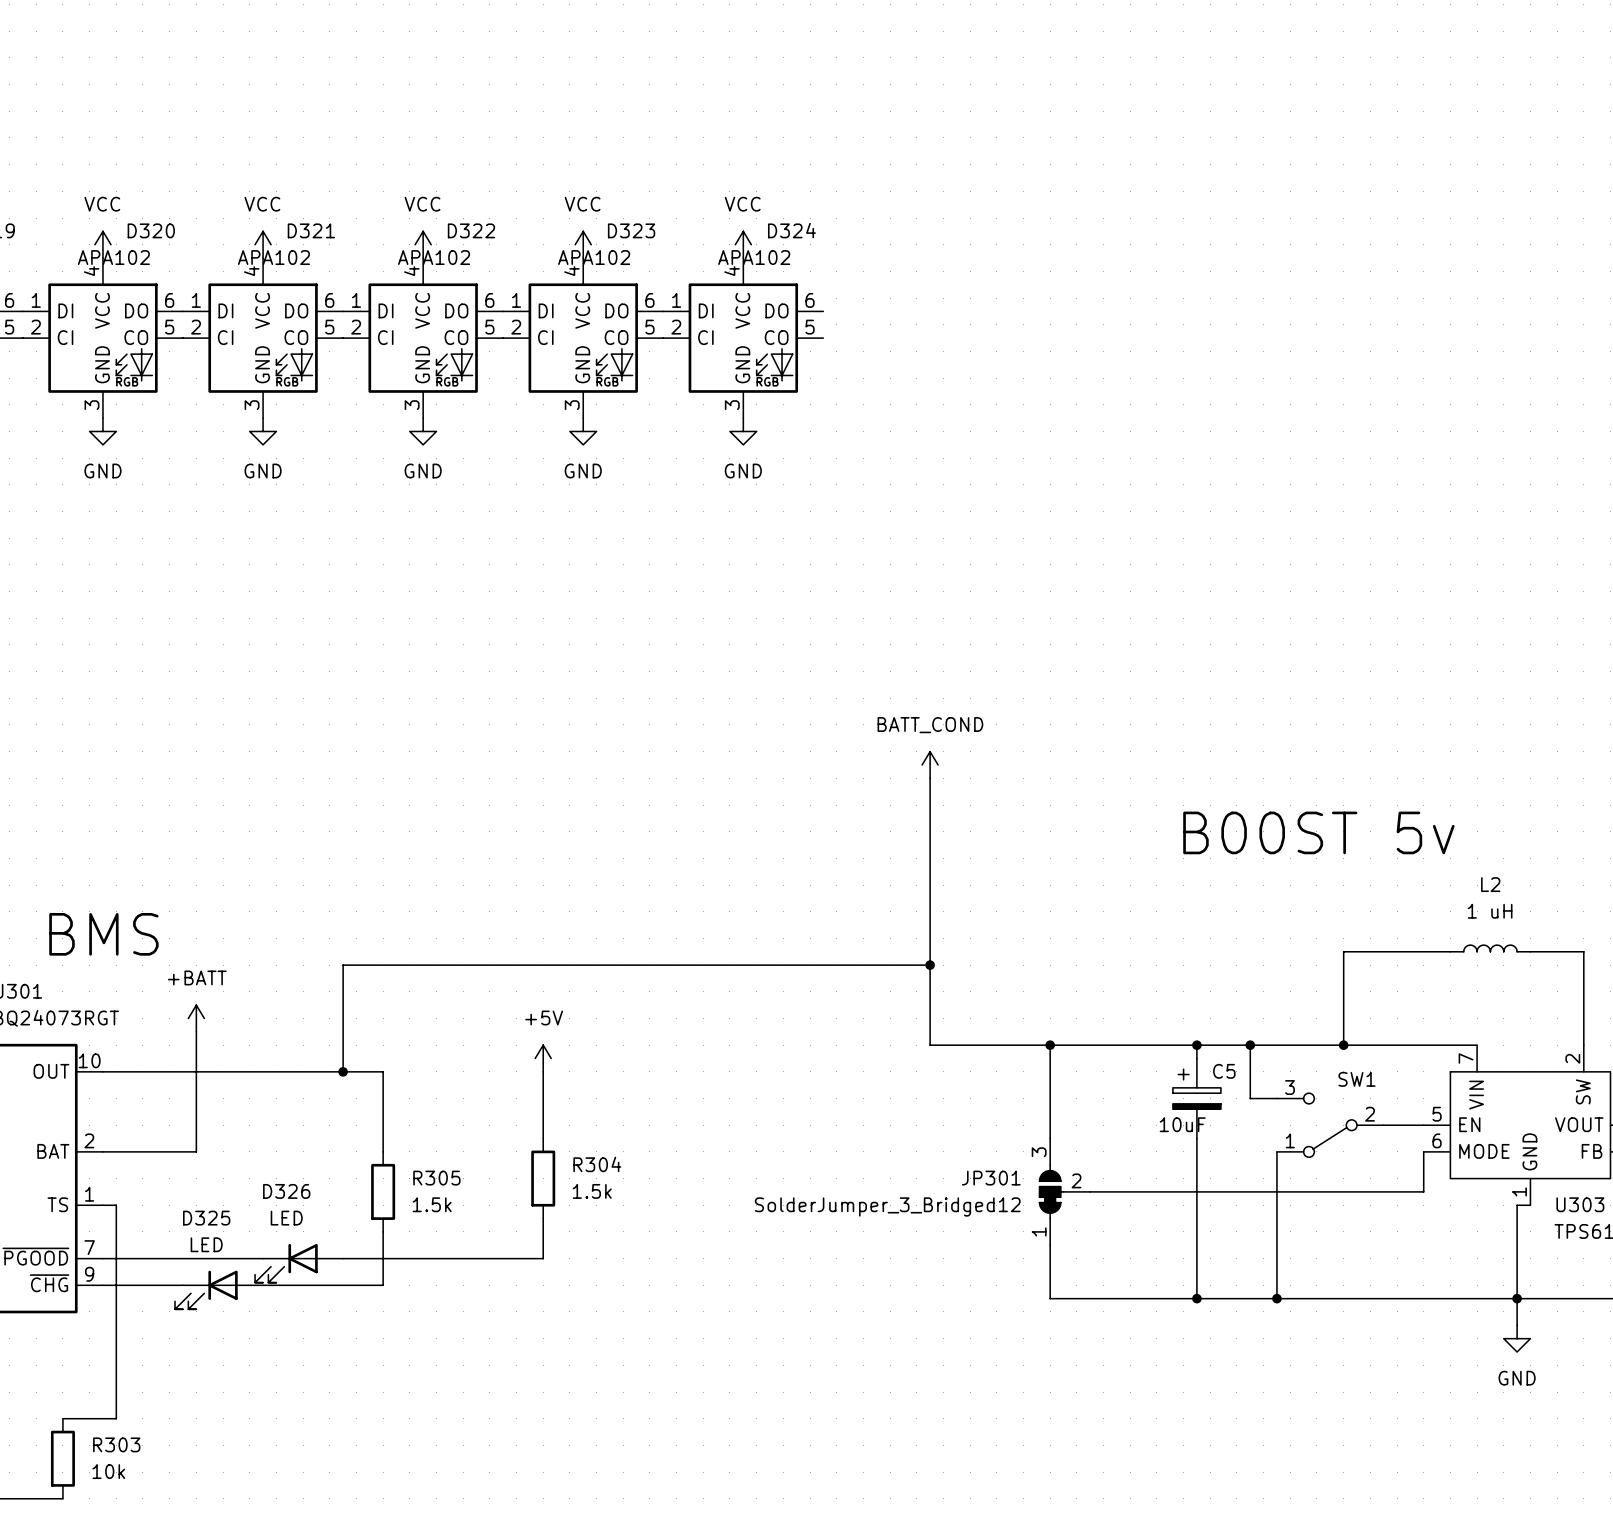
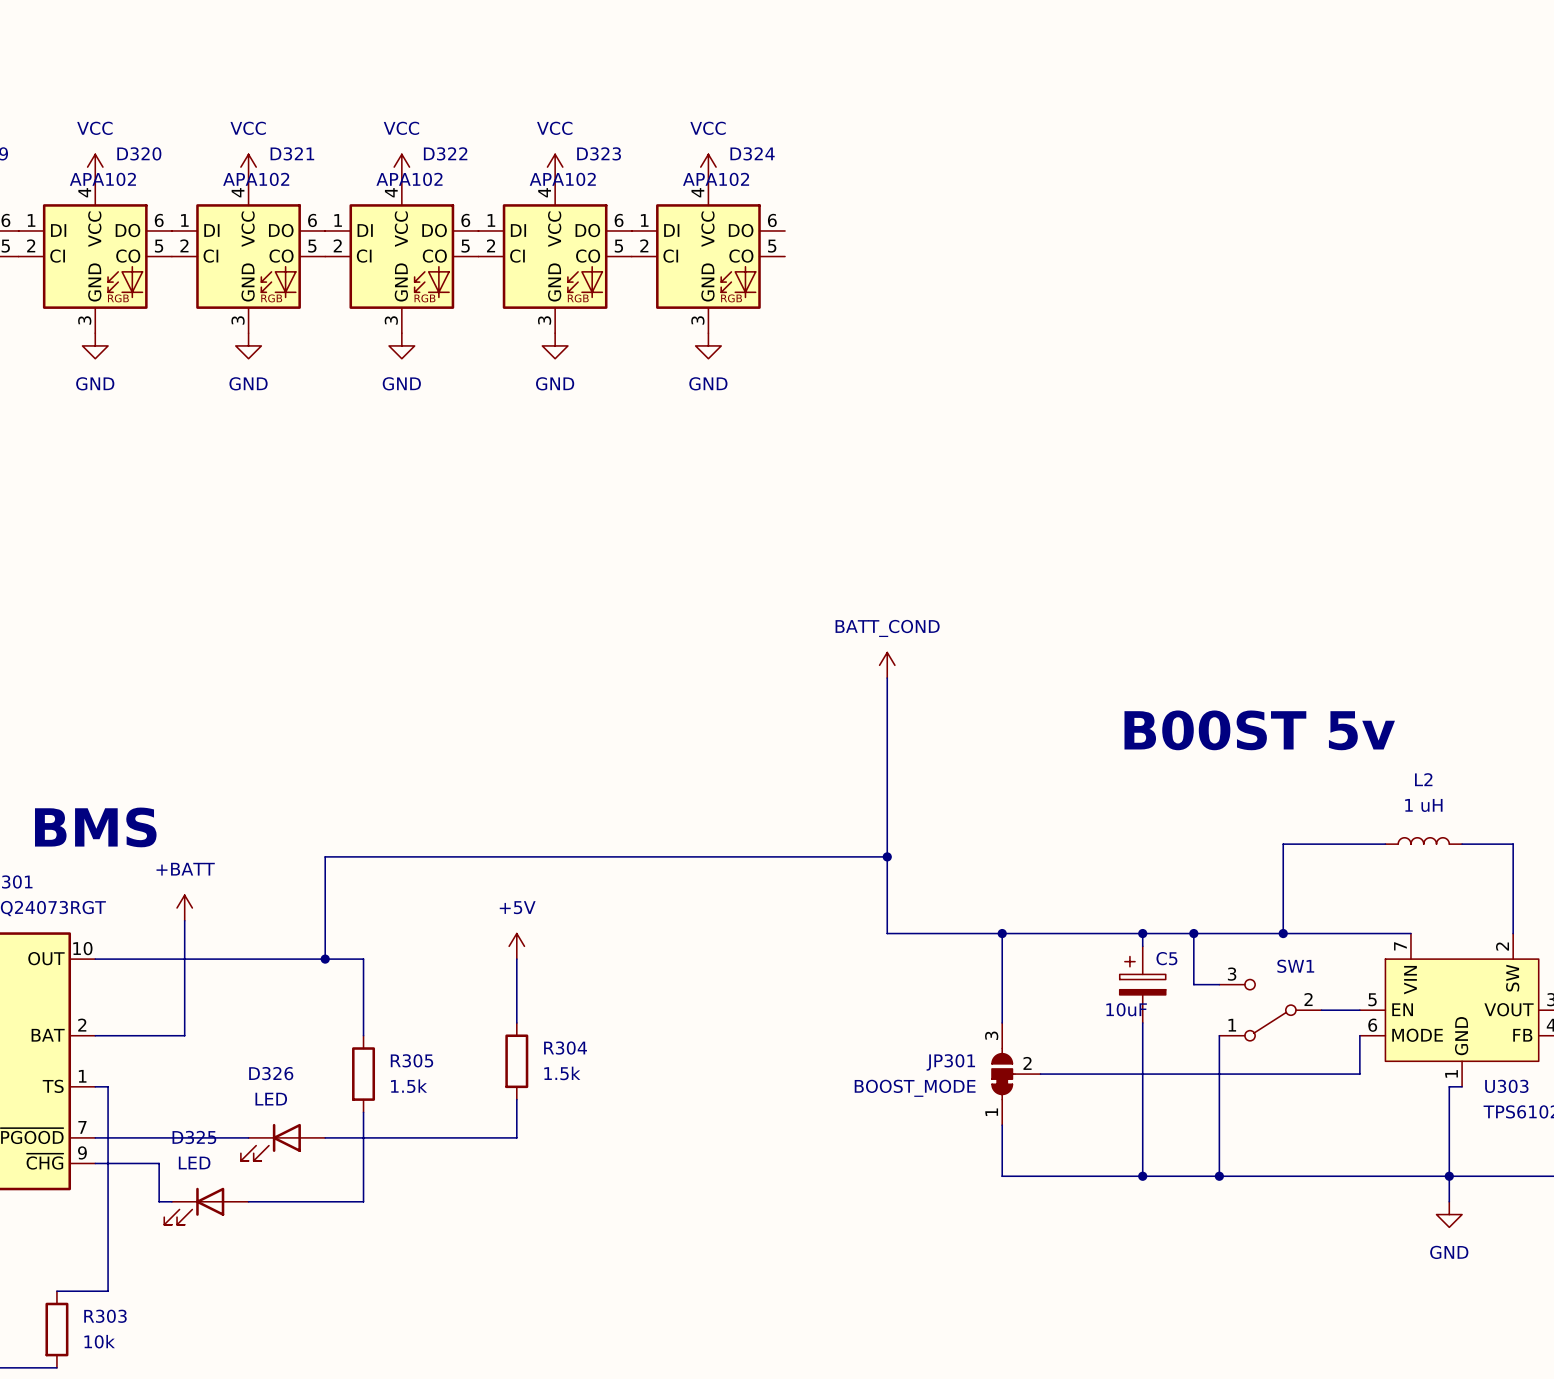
JP301 value: SolderJumper_3_Bridged12 (887, 1206) -> BOOST_MODE (915, 1088)
wire: (169, 1285) (183, 1285) -> (159, 1163) (159, 1201) (171, 1201)
wire: (263, 1285) (383, 1285) -> (248, 1201) (363, 1201) (363, 1163)
D325 position: (219, 1289) -> (206, 1206)

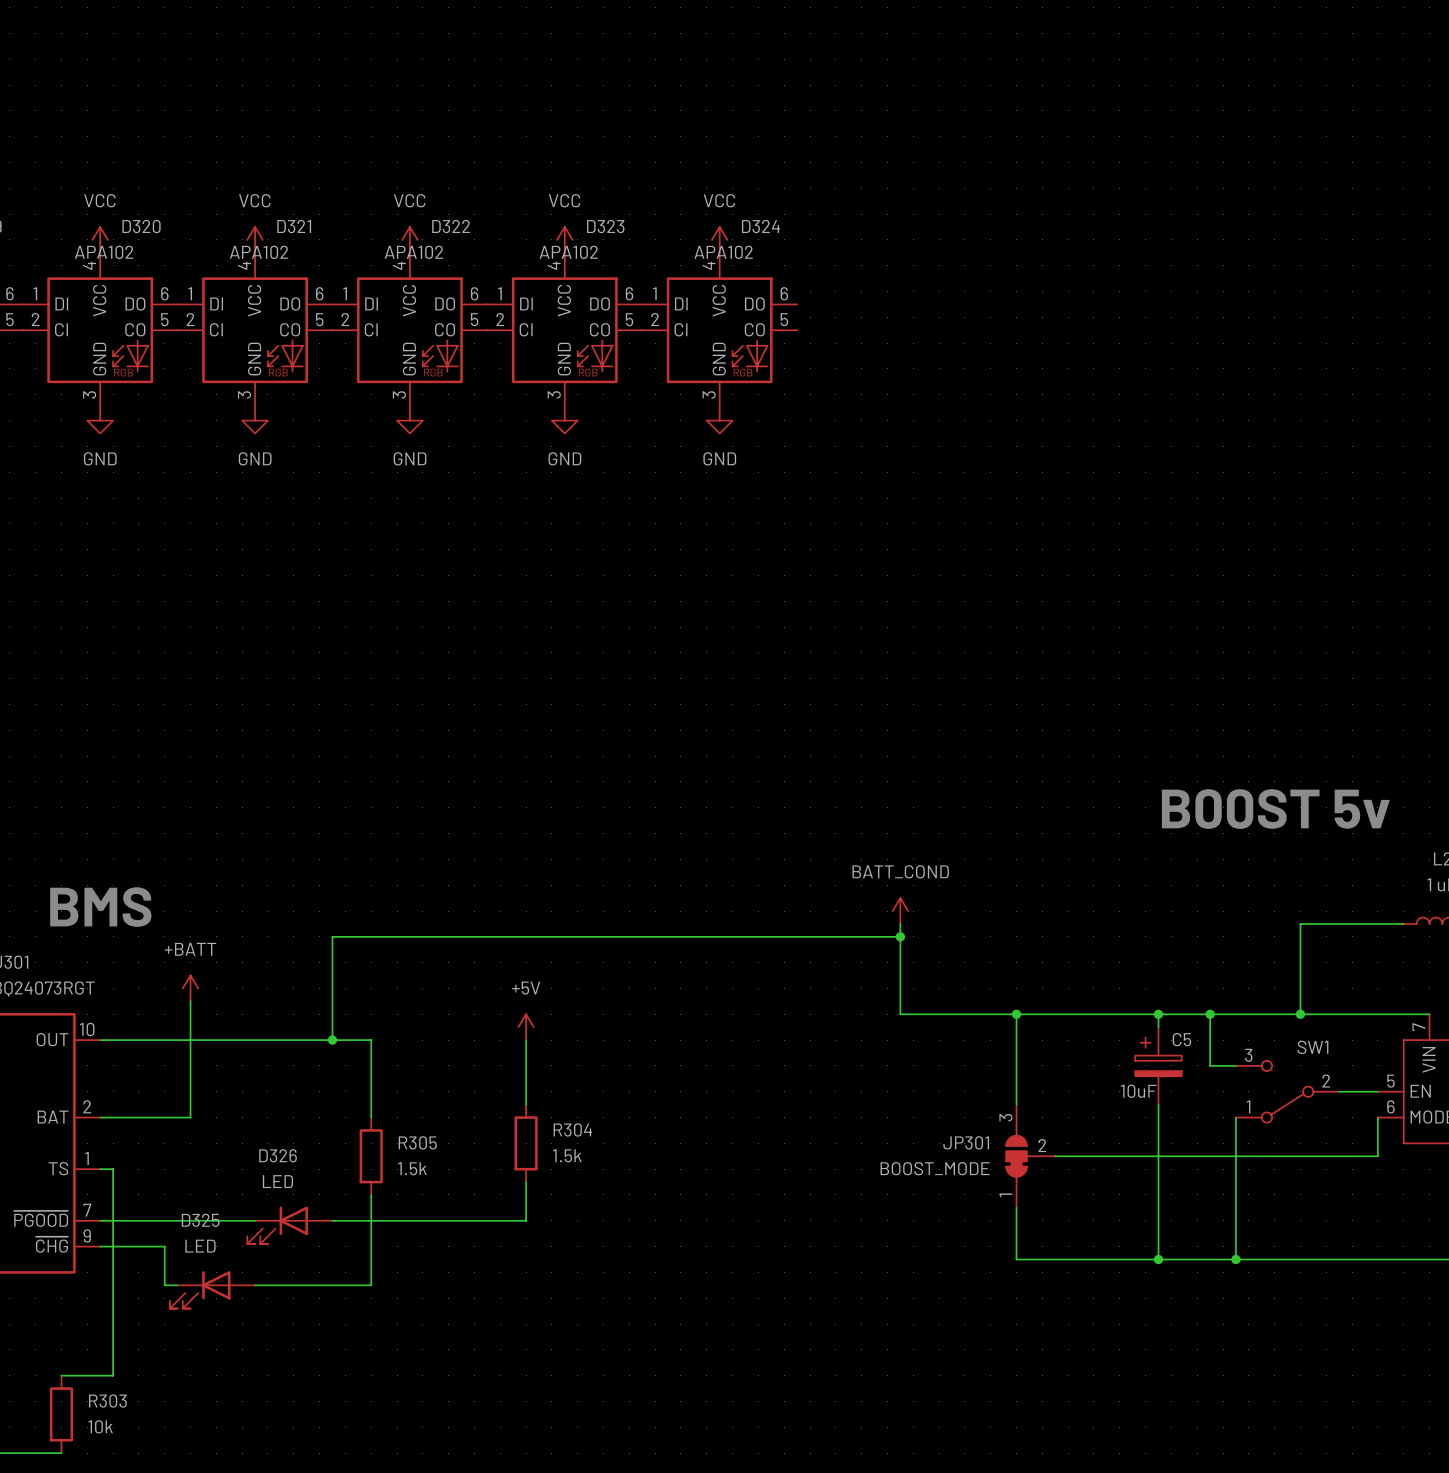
power symbol position: BATT_COND (887, 665) -> BATT_COND (900, 911)
wire: (887, 678) (887, 844) -> none

